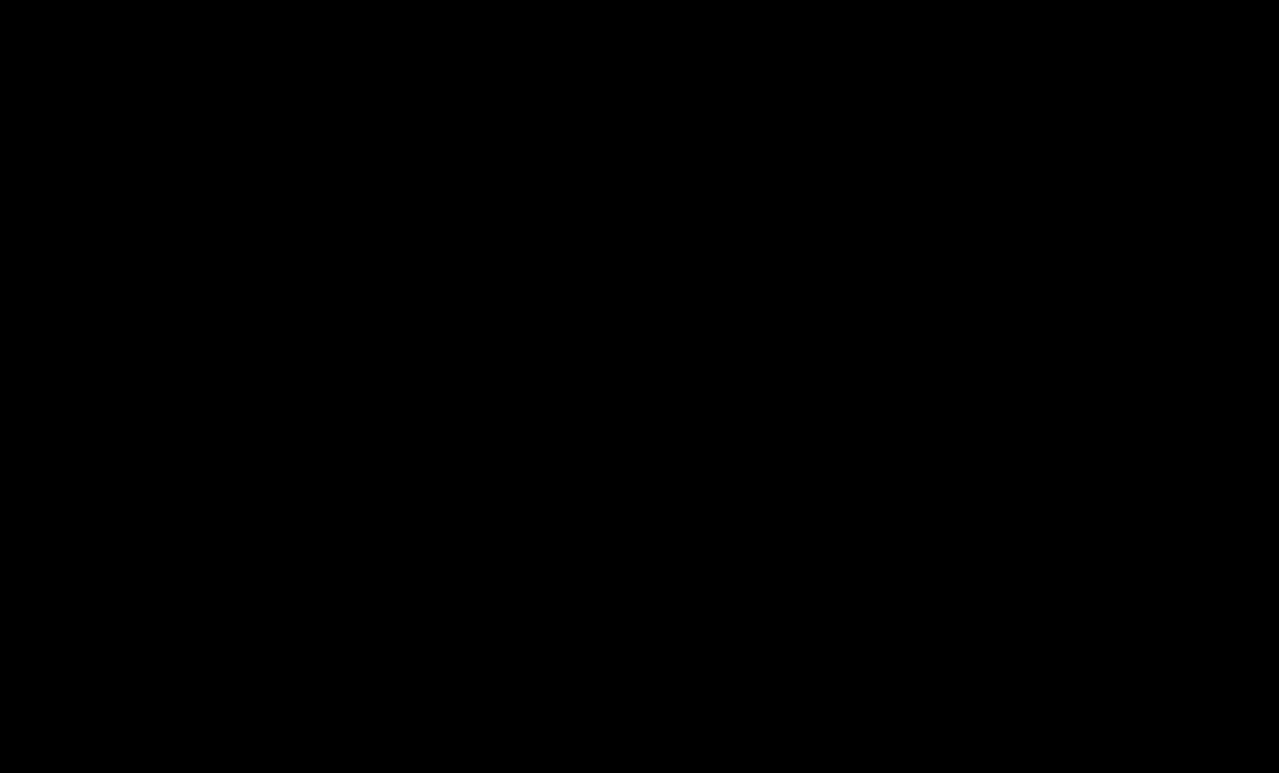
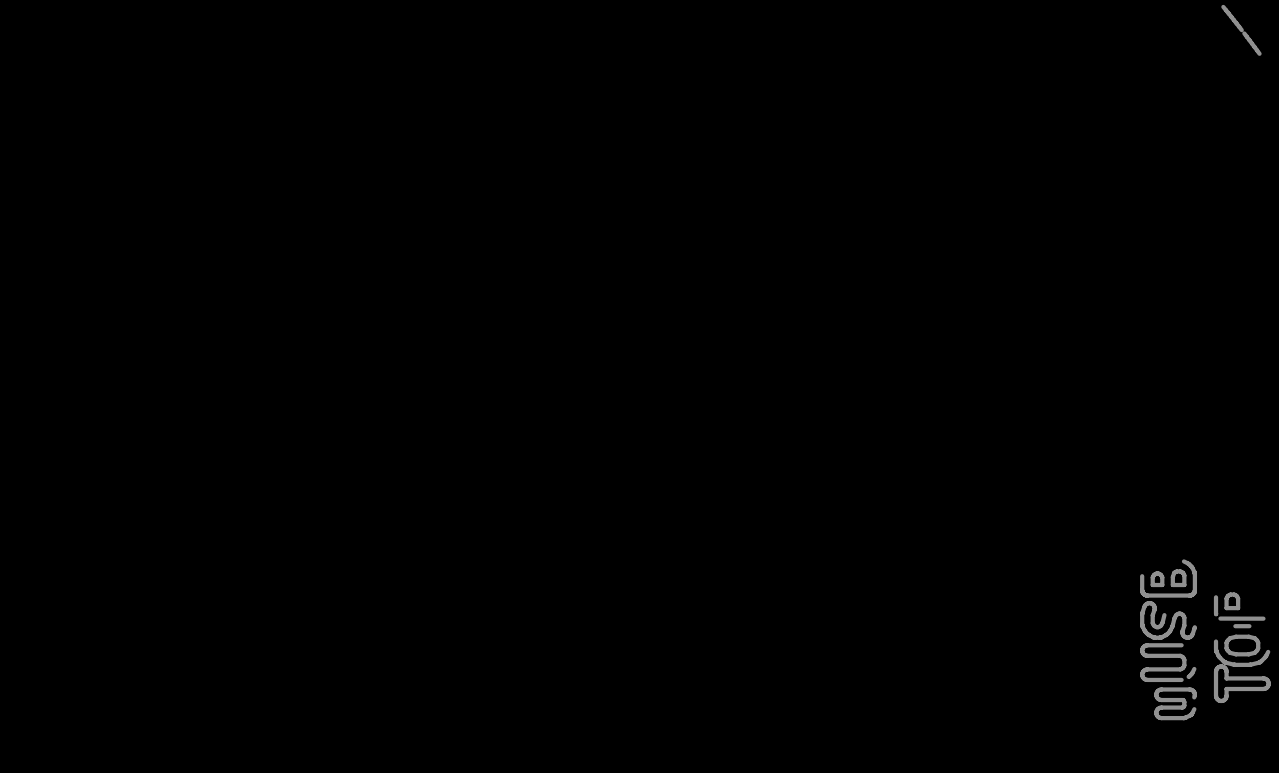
line: none -> (1223, 6) (1241, 30)
line: none -> (1244, 33) (1259, 53)
line: none -> (1183, 561) (1189, 564) (1194, 571)
line: none -> (1174, 572) (1180, 571) (1183, 573) (1184, 585) (1172, 585) (1174, 573)
line: none -> (1156, 573) (1162, 577) (1162, 585) (1152, 585) (1152, 577) (1156, 573)
line: none -> (1194, 574) (1194, 590)
line: none -> (1142, 576) (1142, 590)
line: none -> (1230, 594) (1237, 596) (1238, 608) (1226, 608) (1226, 598) (1230, 594)
line: none -> (1147, 595) (1189, 595)
line: none -> (1216, 597) (1216, 613)
line: none -> (1164, 615) (1161, 625) (1158, 627) (1154, 626) (1152, 623) (1154, 606) (1152, 603) (1146, 603) (1142, 612) (1142, 624)
line: none -> (1220, 618) (1263, 618)
line: none -> (1172, 625) (1175, 615) (1180, 613) (1184, 617) (1183, 635) (1190, 636) (1194, 627)
line: none -> (1142, 626) (1148, 634)
line: none -> (1172, 626) (1166, 634)
line: none -> (1235, 626) (1249, 626)
line: none -> (1149, 635) (1153, 637)
line: none -> (1165, 635) (1161, 637)
line: none -> (1236, 636) (1254, 638) (1258, 642) (1257, 650) (1248, 654) (1230, 652) (1226, 648) (1226, 642) (1230, 638) (1236, 636)
line: none -> (1155, 637) (1159, 637)
line: none -> (1216, 641) (1216, 649)
line: none -> (1181, 645) (1147, 645) (1142, 649) (1145, 655) (1180, 655) (1184, 659) (1184, 665) (1180, 669) (1145, 669) (1142, 673) (1144, 678) (1181, 679)
line: none -> (1216, 651) (1223, 661)
line: none -> (1268, 651) (1261, 661)
line: none -> (1226, 662) (1234, 664)
line: none -> (1258, 662) (1250, 664)
line: none -> (1235, 664) (1249, 664)
line: none -> (1220, 666) (1226, 669) (1226, 678) (1265, 678) (1268, 681) (1268, 686) (1263, 688) (1226, 688) (1225, 699) (1218, 700) (1216, 695) (1216, 671) (1220, 666)
line: none -> (1194, 668) (1188, 676)
line: none -> (1194, 697) (1194, 692) (1189, 689) (1161, 689) (1156, 692) (1156, 697) (1159, 699) (1183, 700) (1184, 702) (1182, 707) (1159, 707) (1156, 711) (1158, 716) (1183, 718)
line: none -> (1194, 709) (1192, 713)
line: none -> (1190, 715) (1185, 717)

